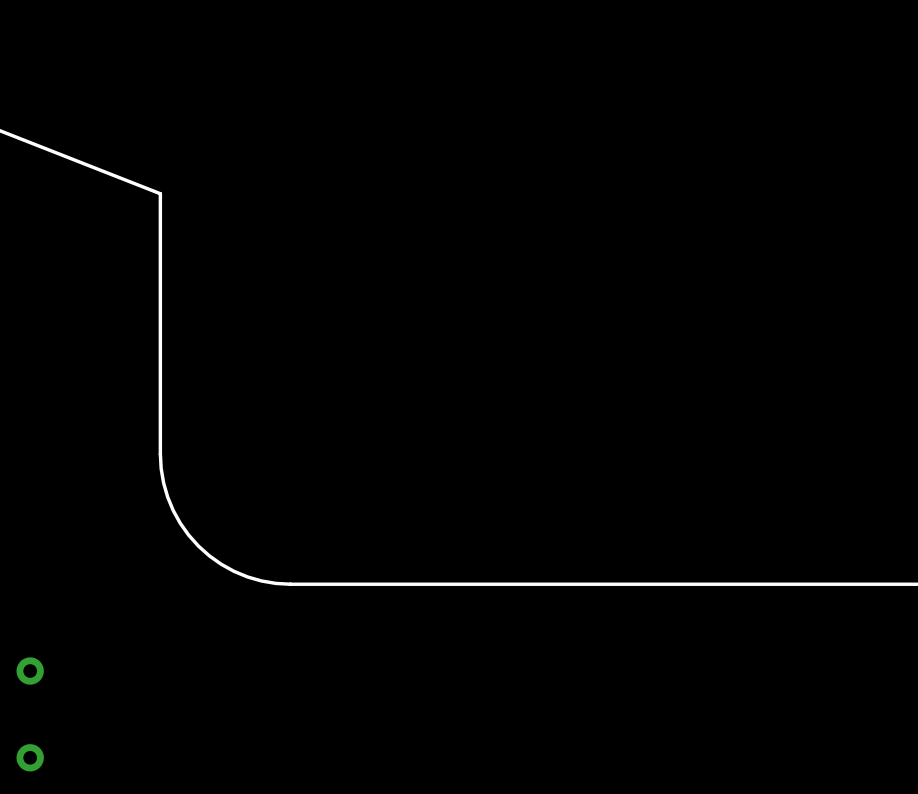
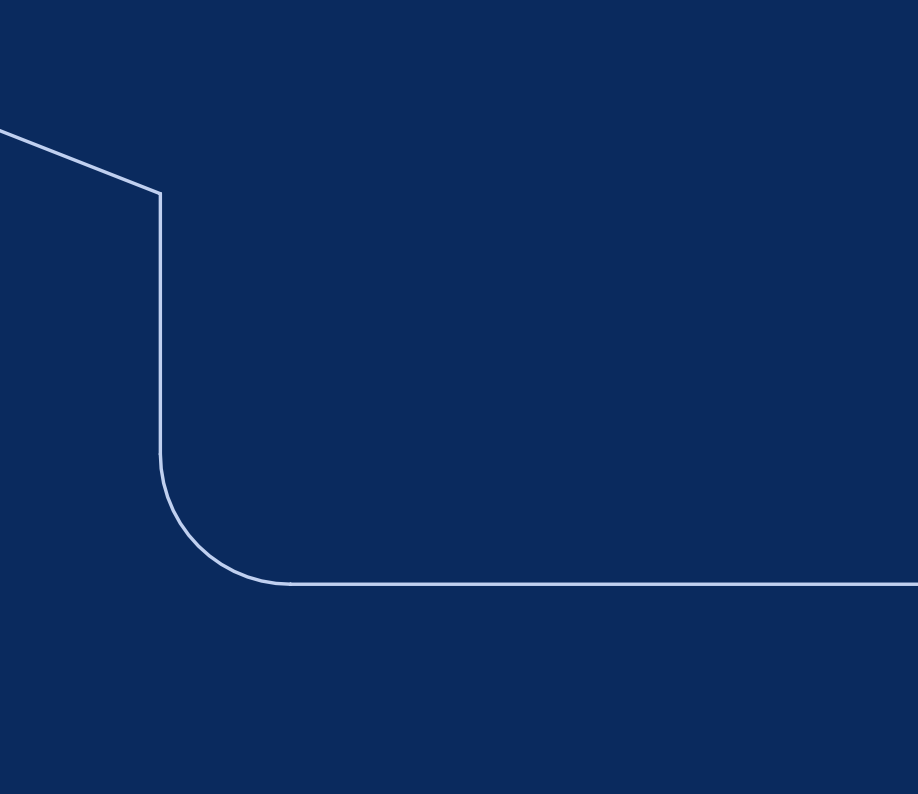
via: (30, 671) -> none
via: (30, 757) -> none

